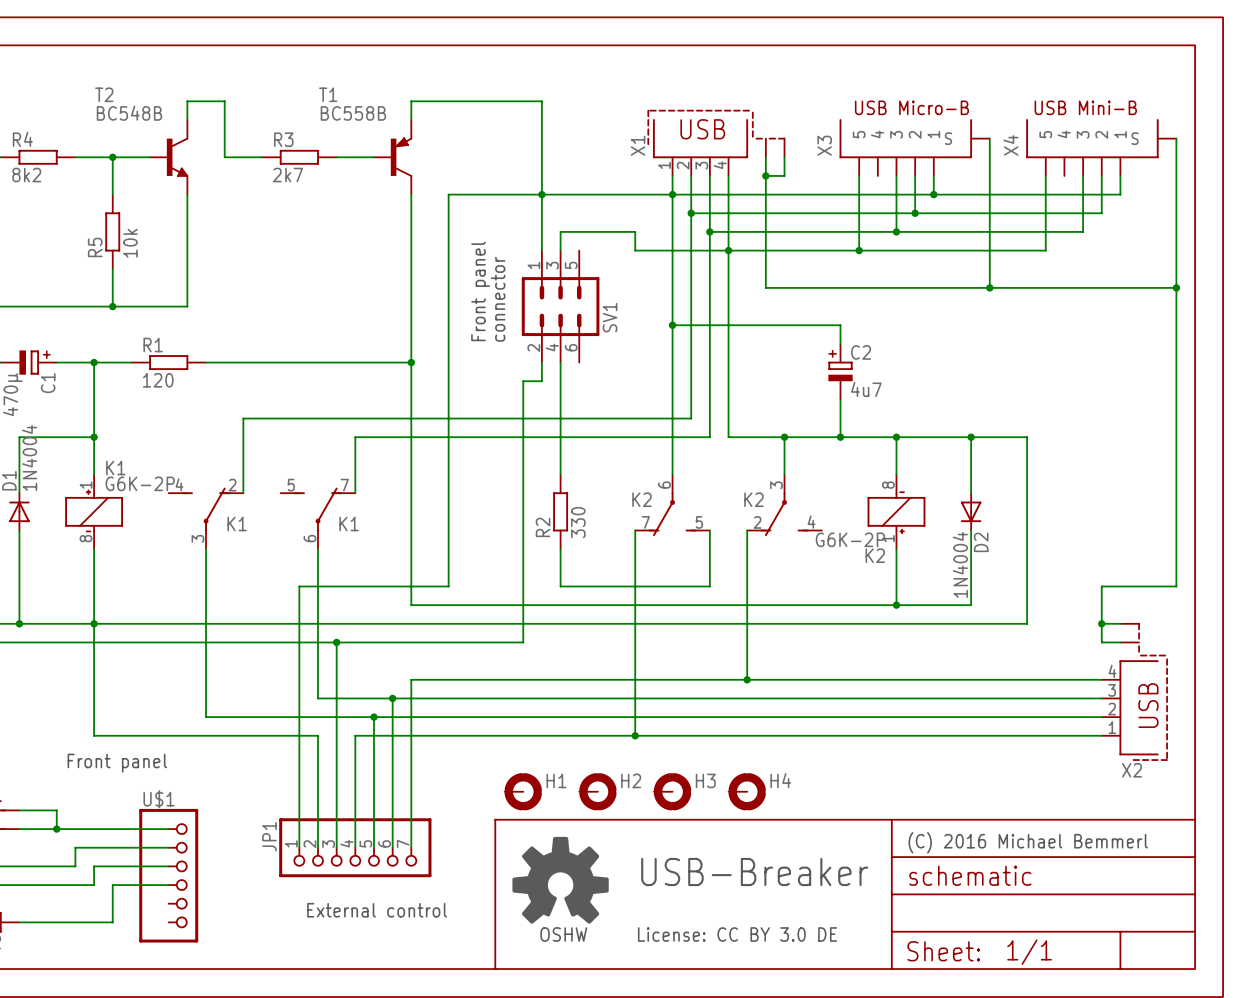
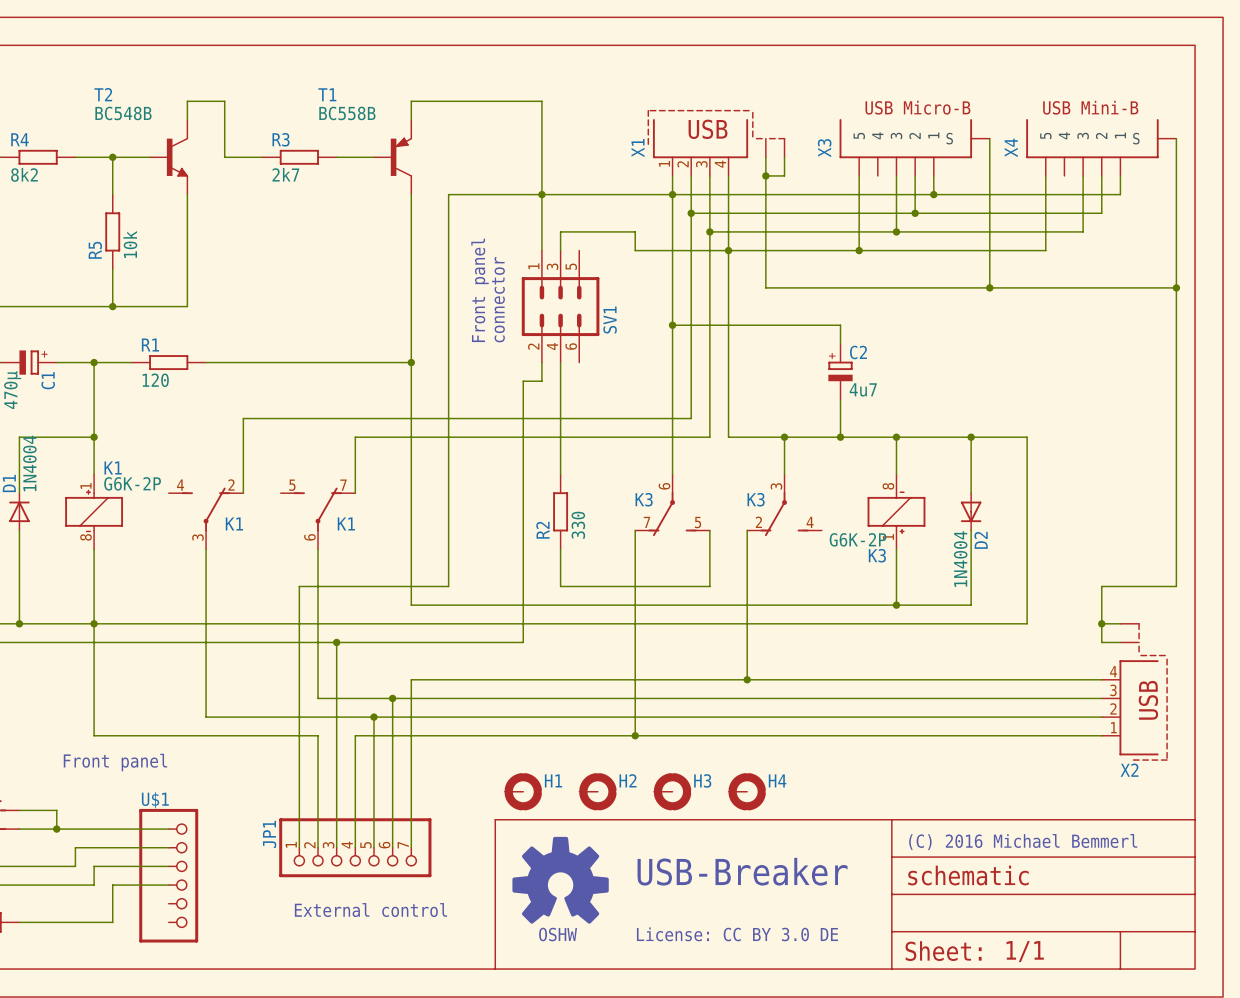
K2 name: K2 (642, 499) -> K3 (644, 499)
K2 name: K2 (753, 499) -> K3 (756, 499)
K2 name: K2 (875, 555) -> K3 (877, 555)

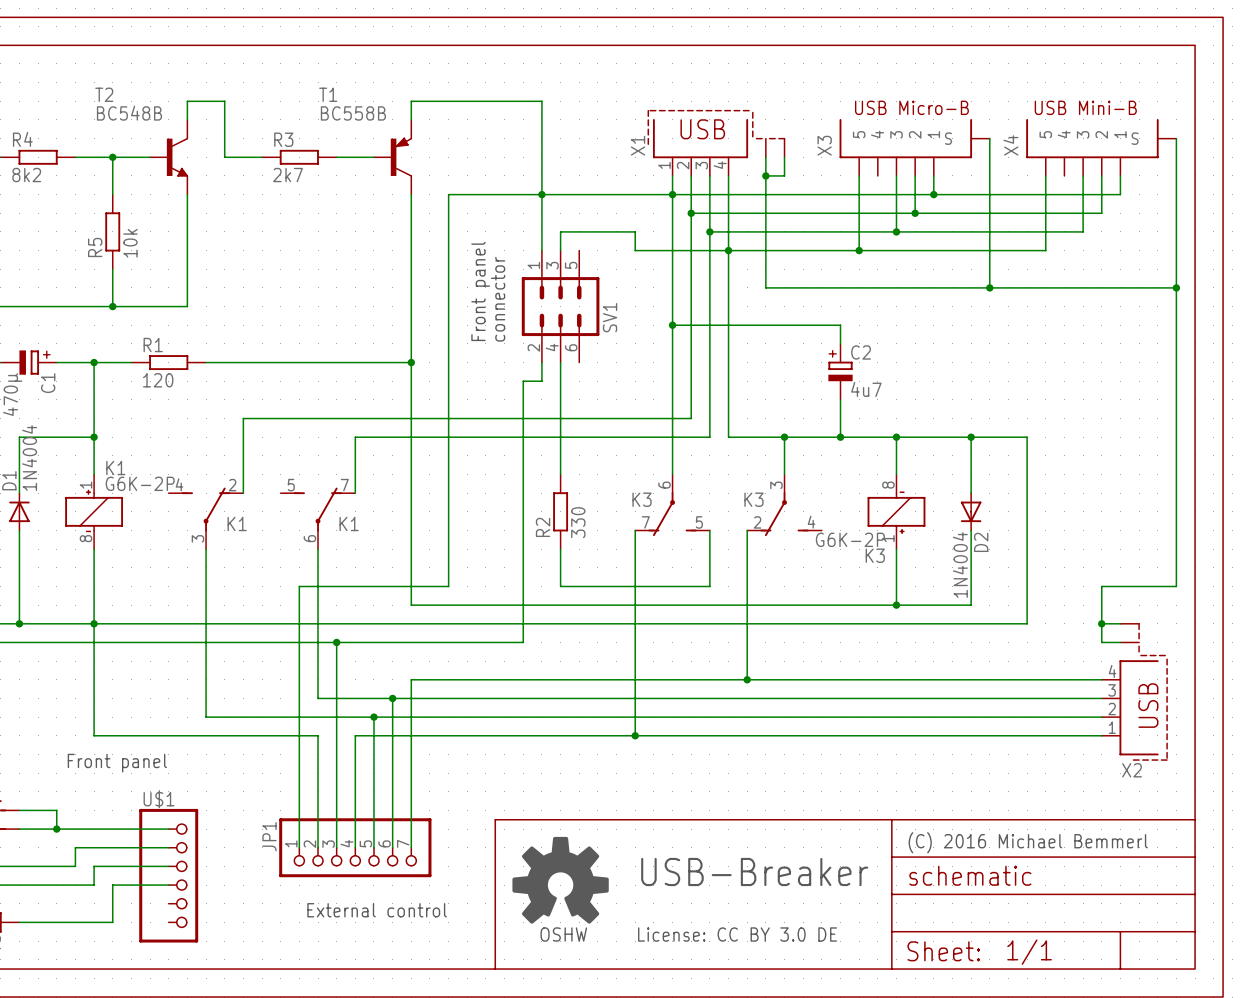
H1: (523, 791) -> none
H2: (597, 791) -> none
H3: (672, 791) -> none
H4: (747, 791) -> none

